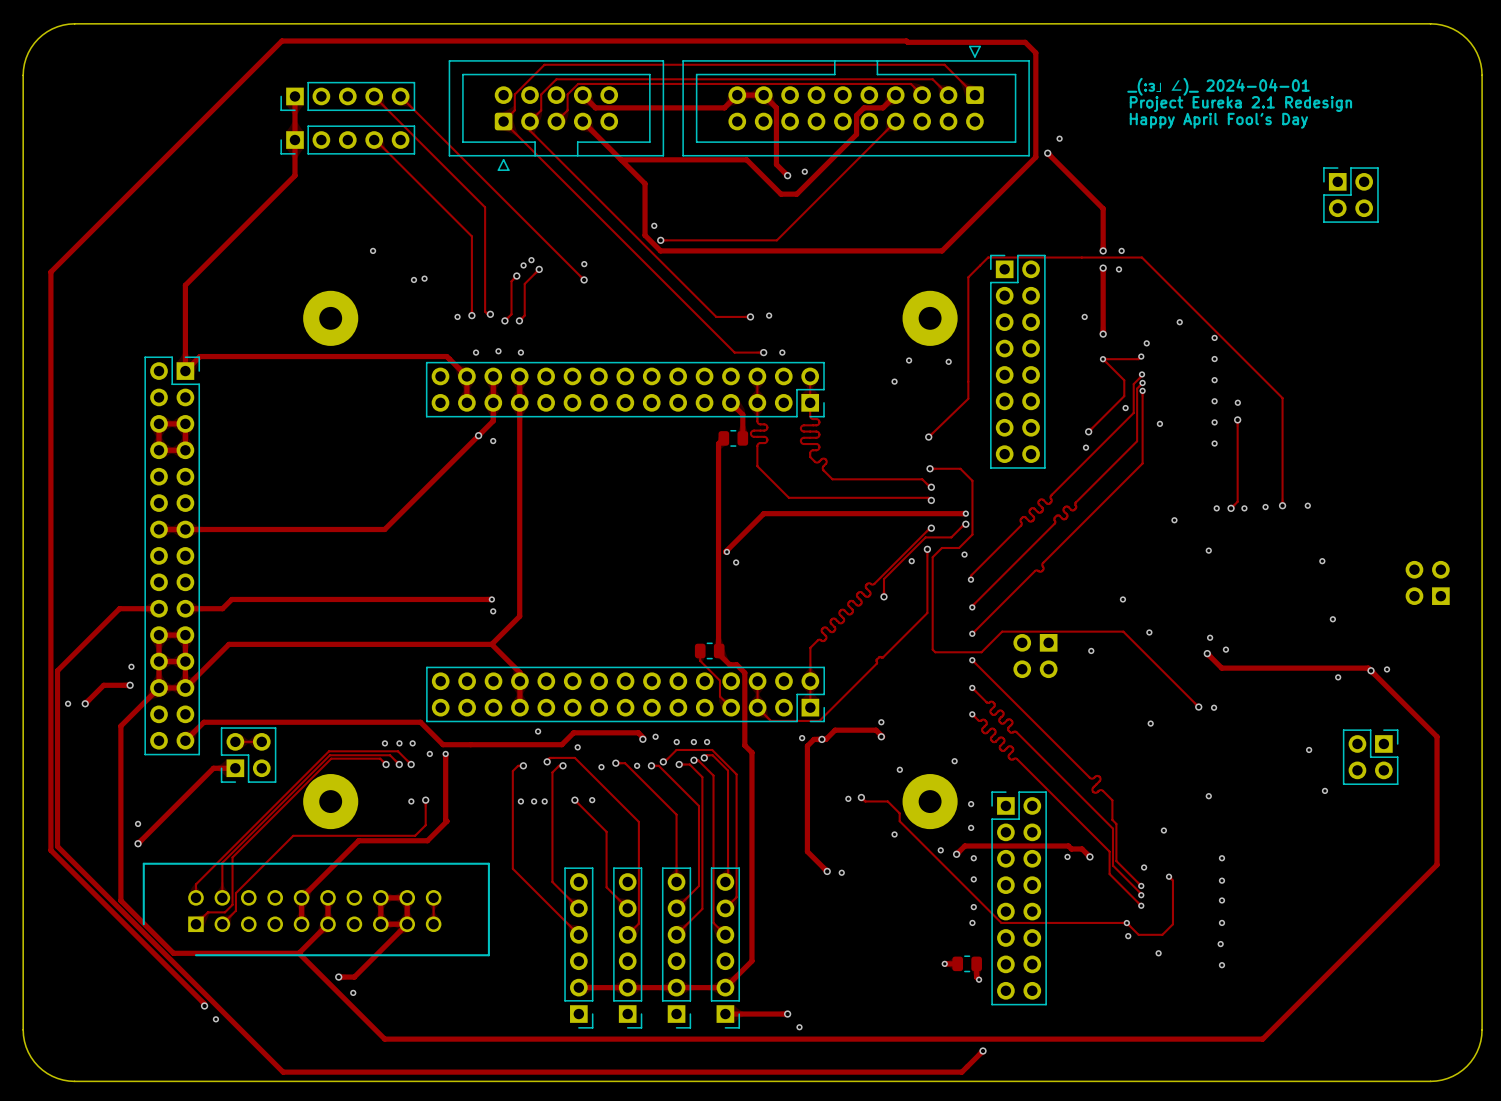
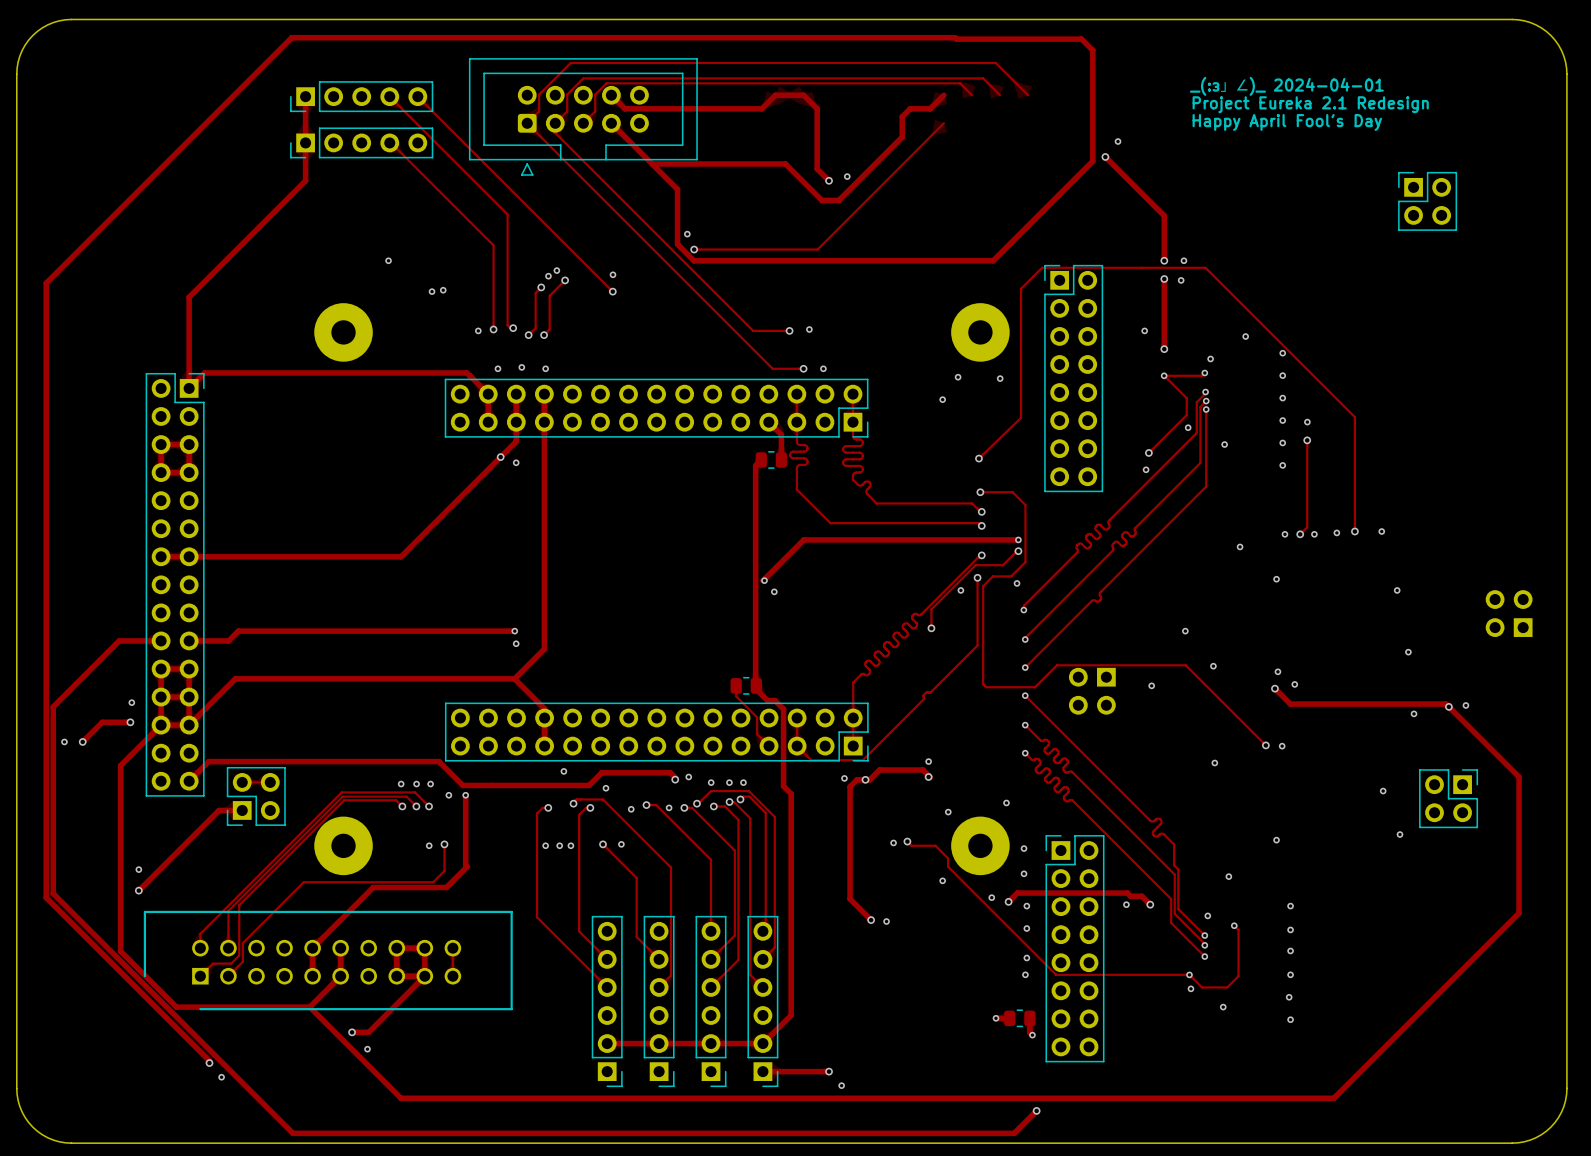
part: (856, 101) -> none

